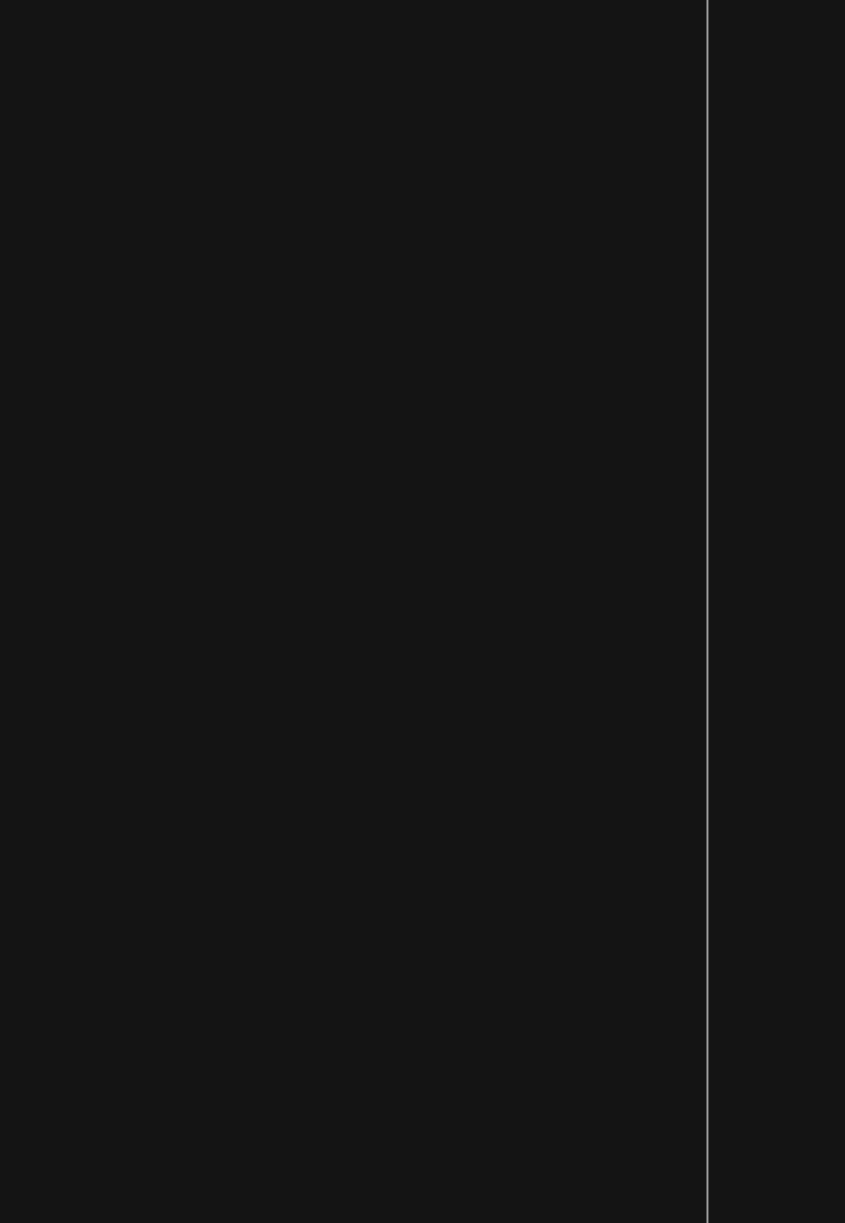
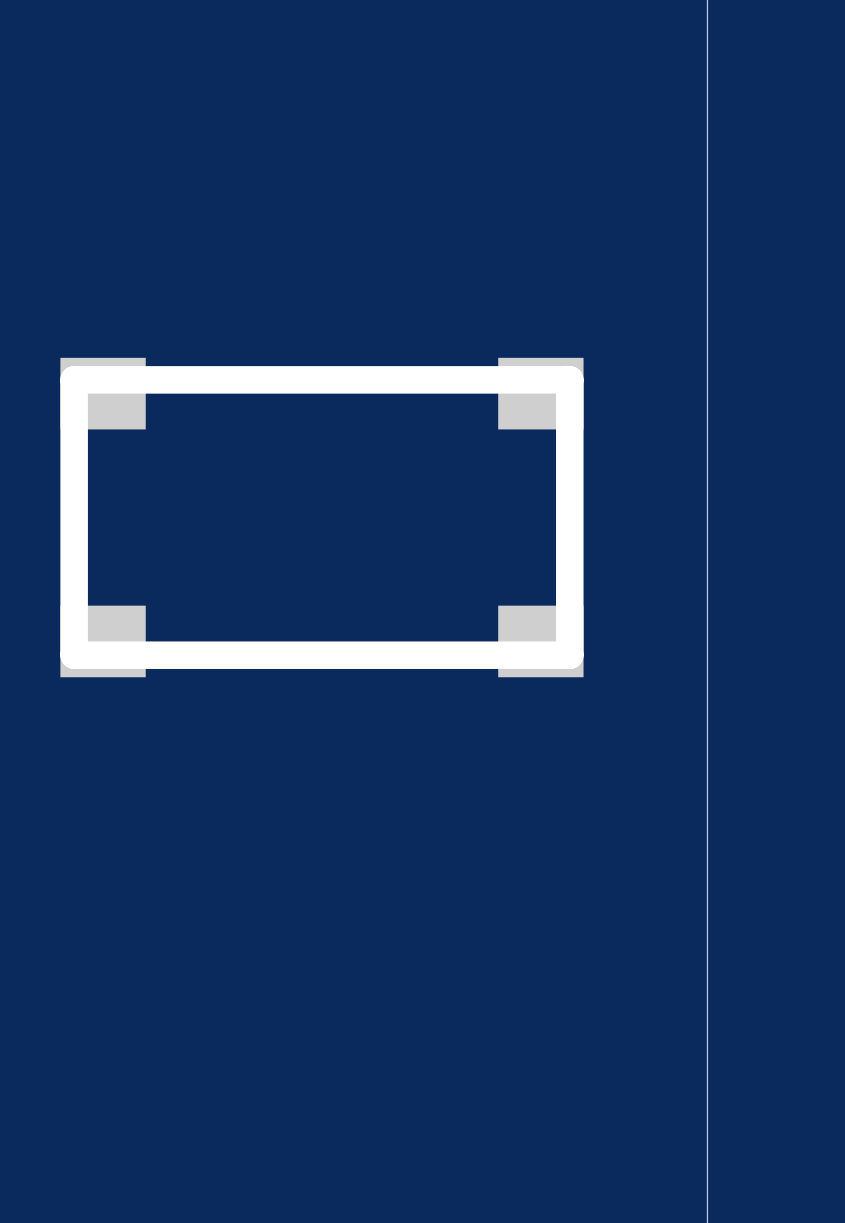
part: none -> (321, 517)

